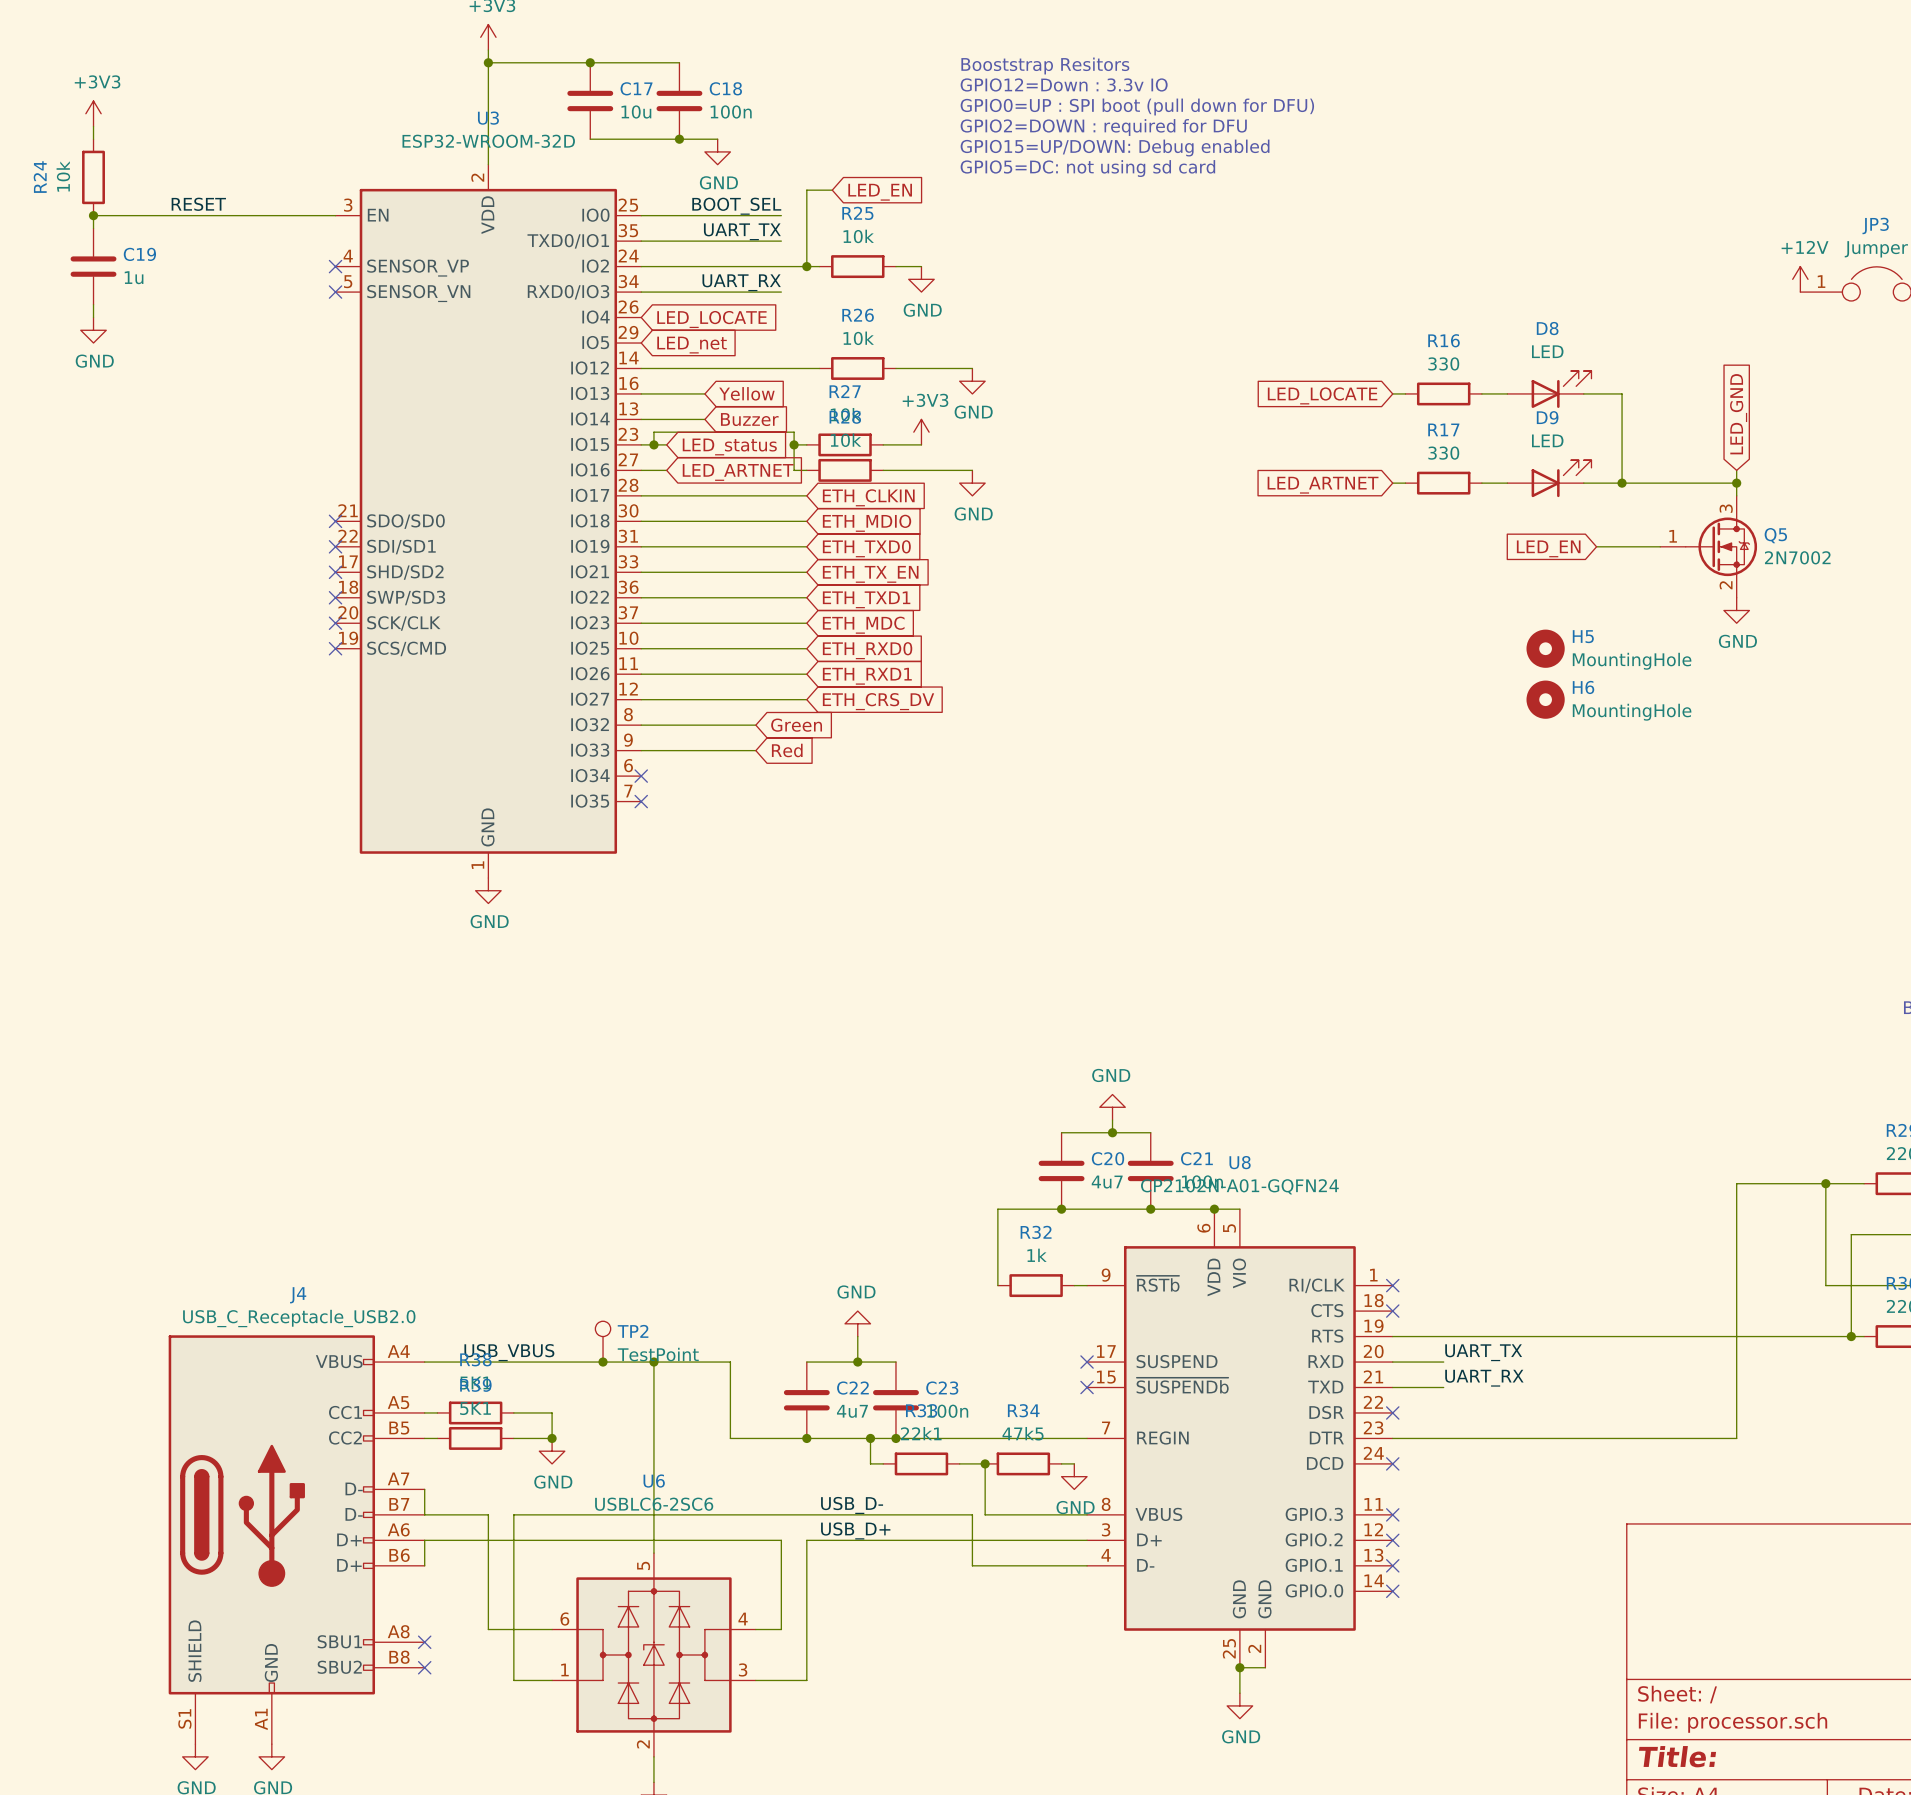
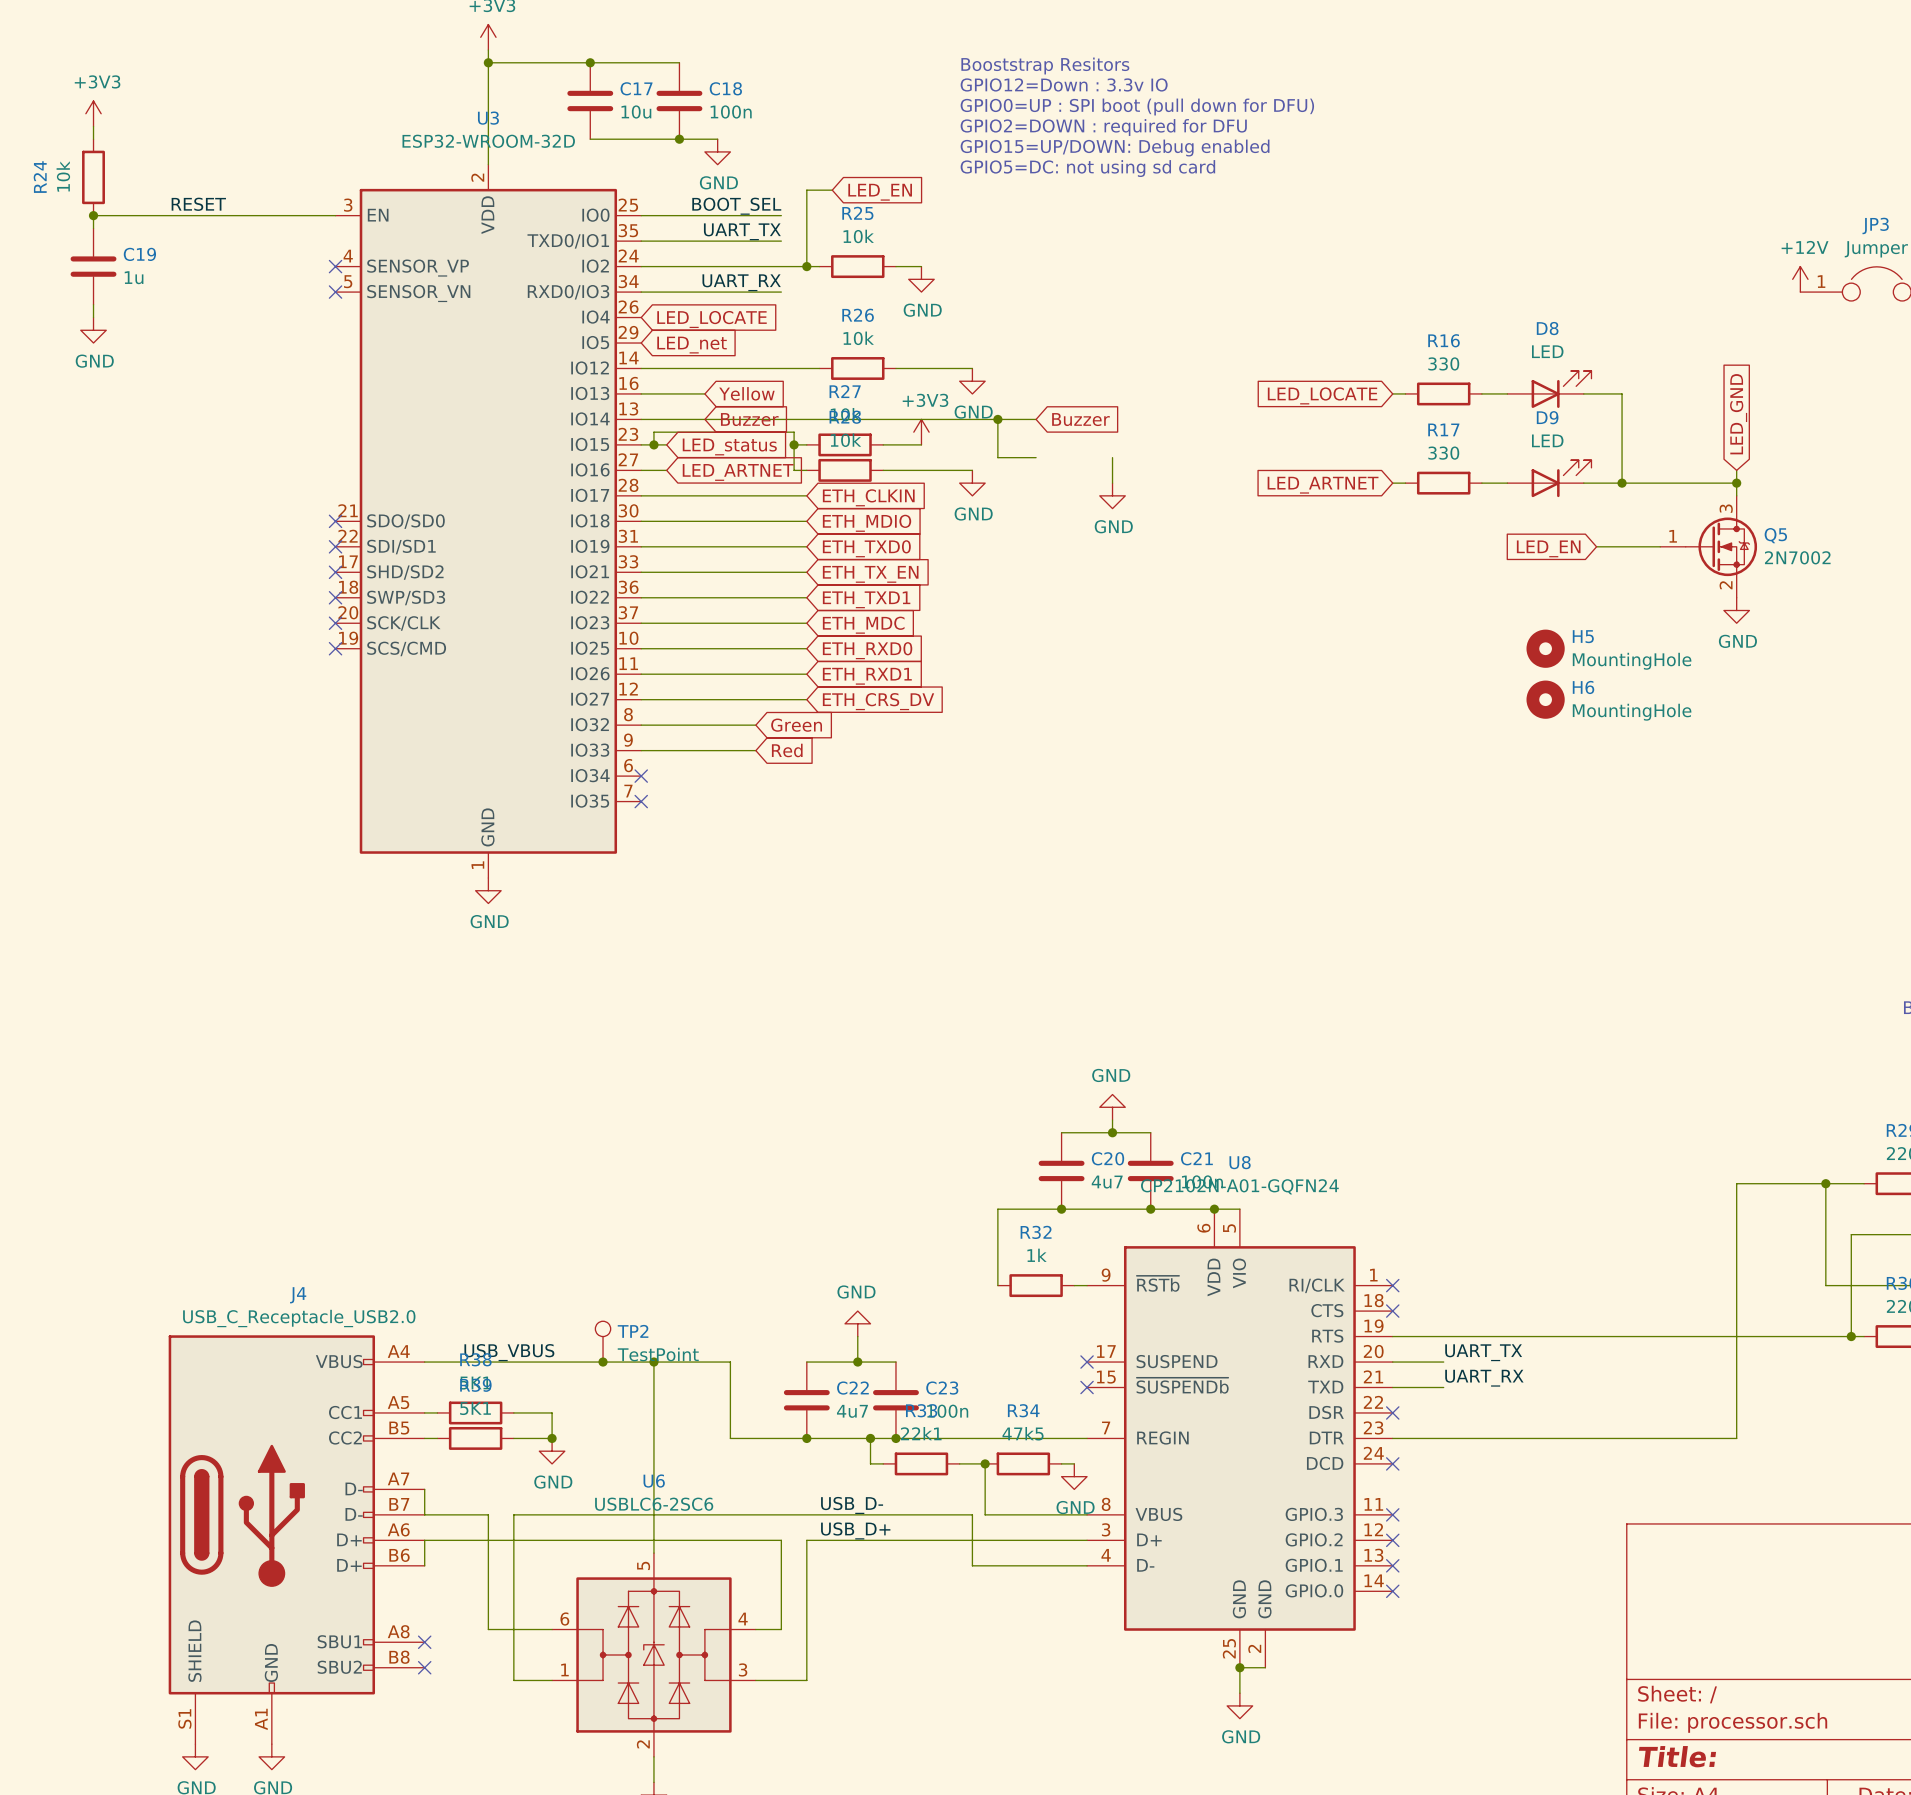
wire: none -> (704, 419) (1036, 419)
wire: none -> (997, 419) (997, 457) (1036, 457)
junction: none -> (997, 419)
global label: none -> Buzzer (1080, 419)
wire: none -> (1112, 457) (1112, 483)
power symbol: none -> GND (1112, 495)

